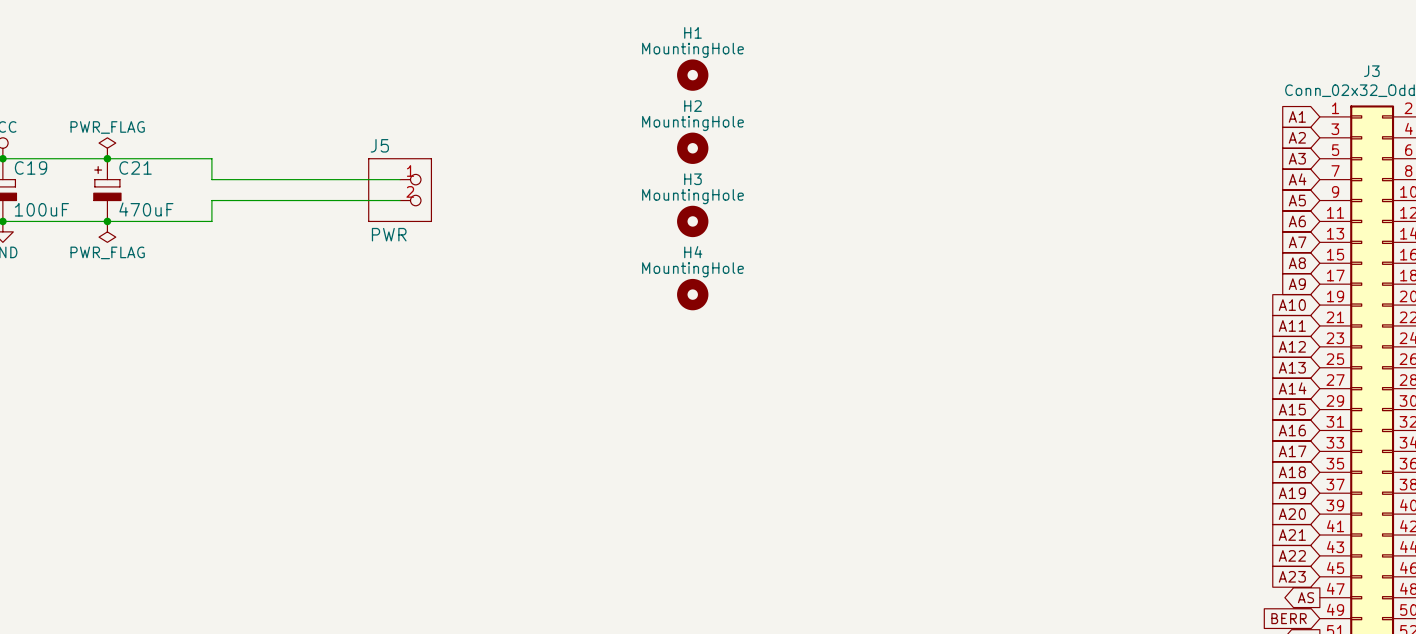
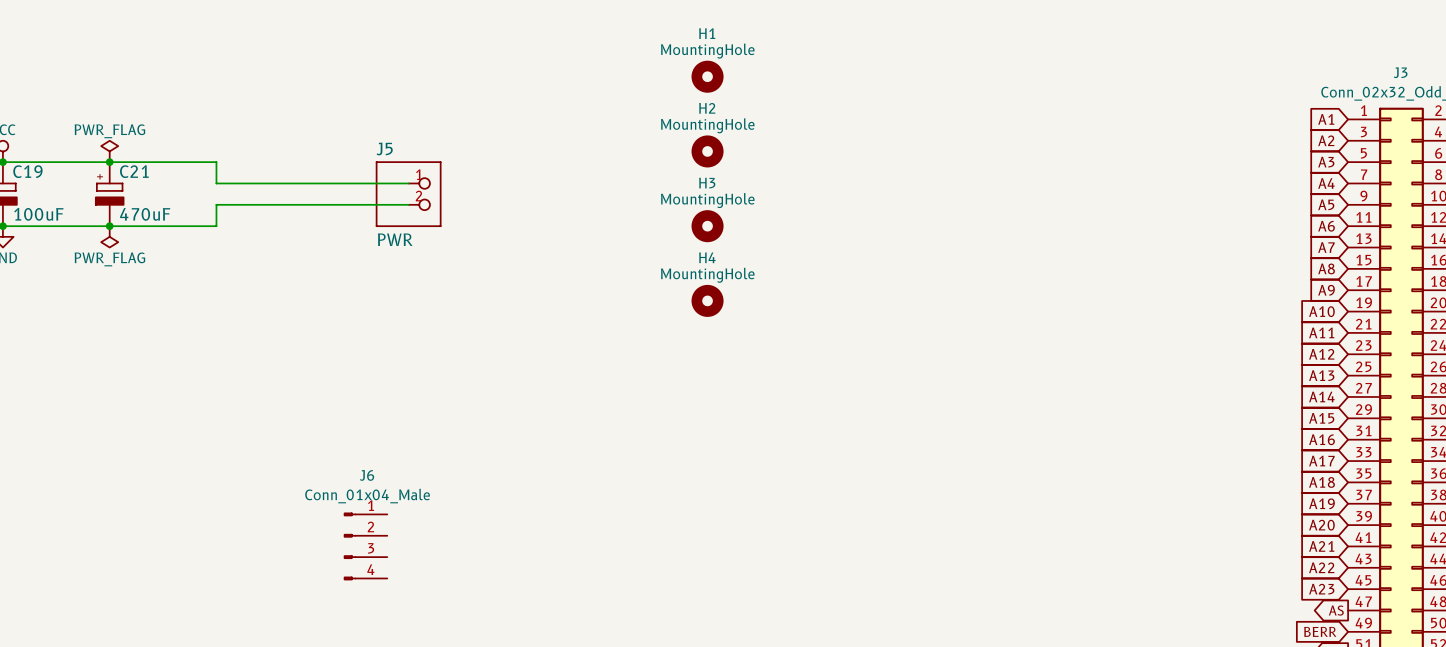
J6: none -> Conn_01x04_Male (365, 546)

